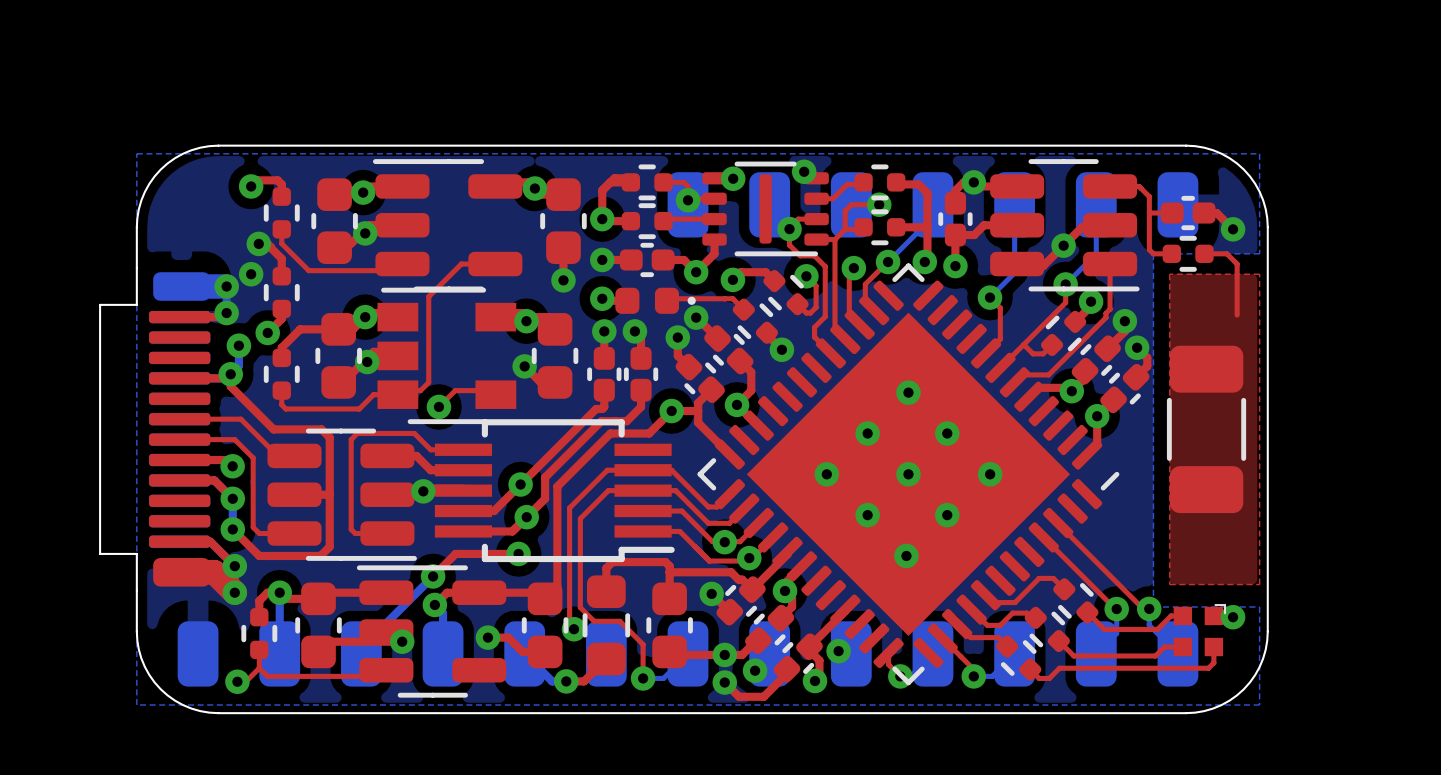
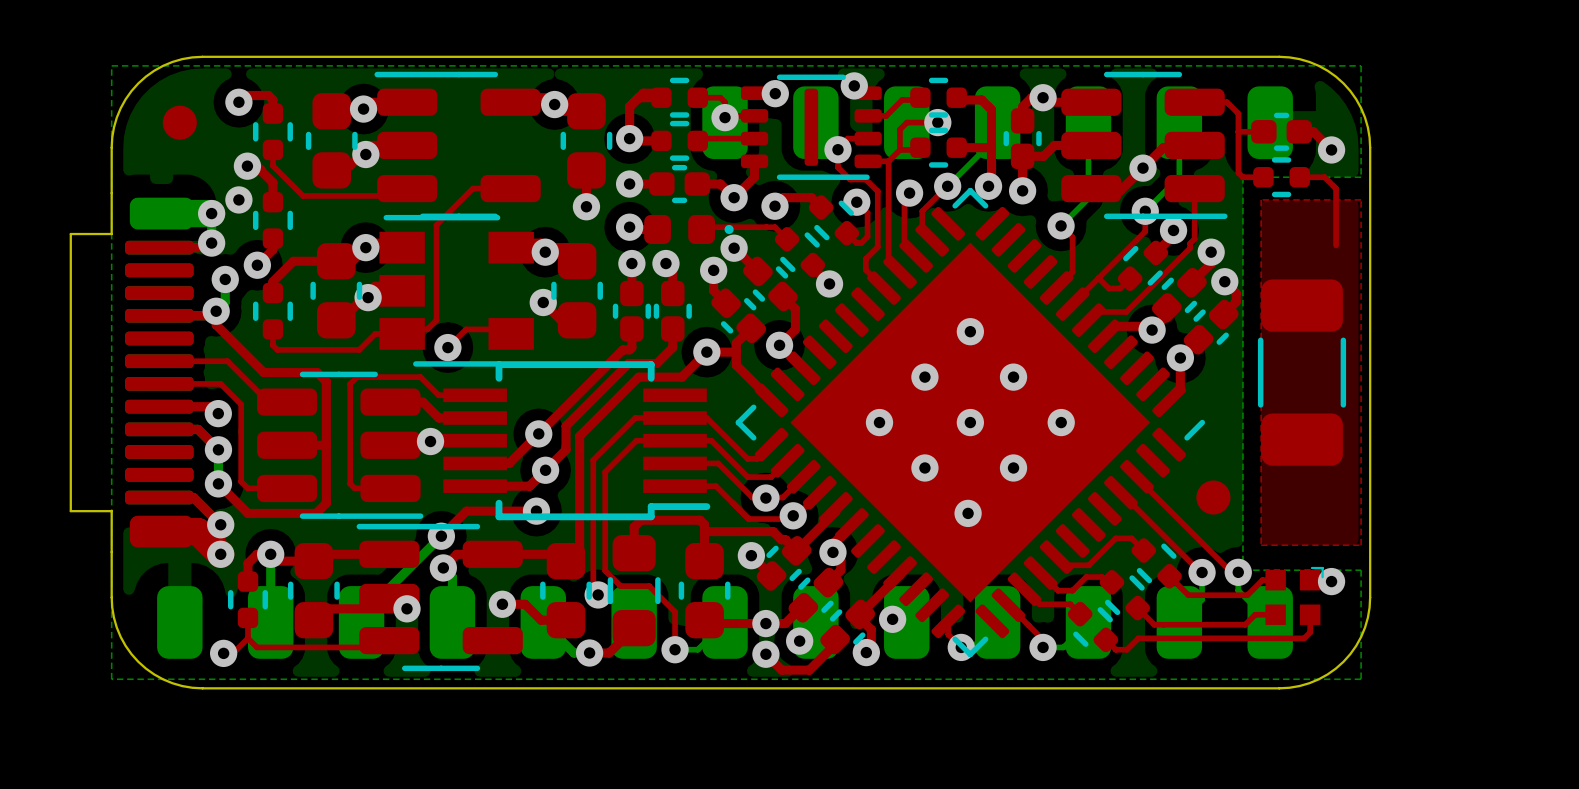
part: none -> (179, 122)
part: none -> (1213, 497)

